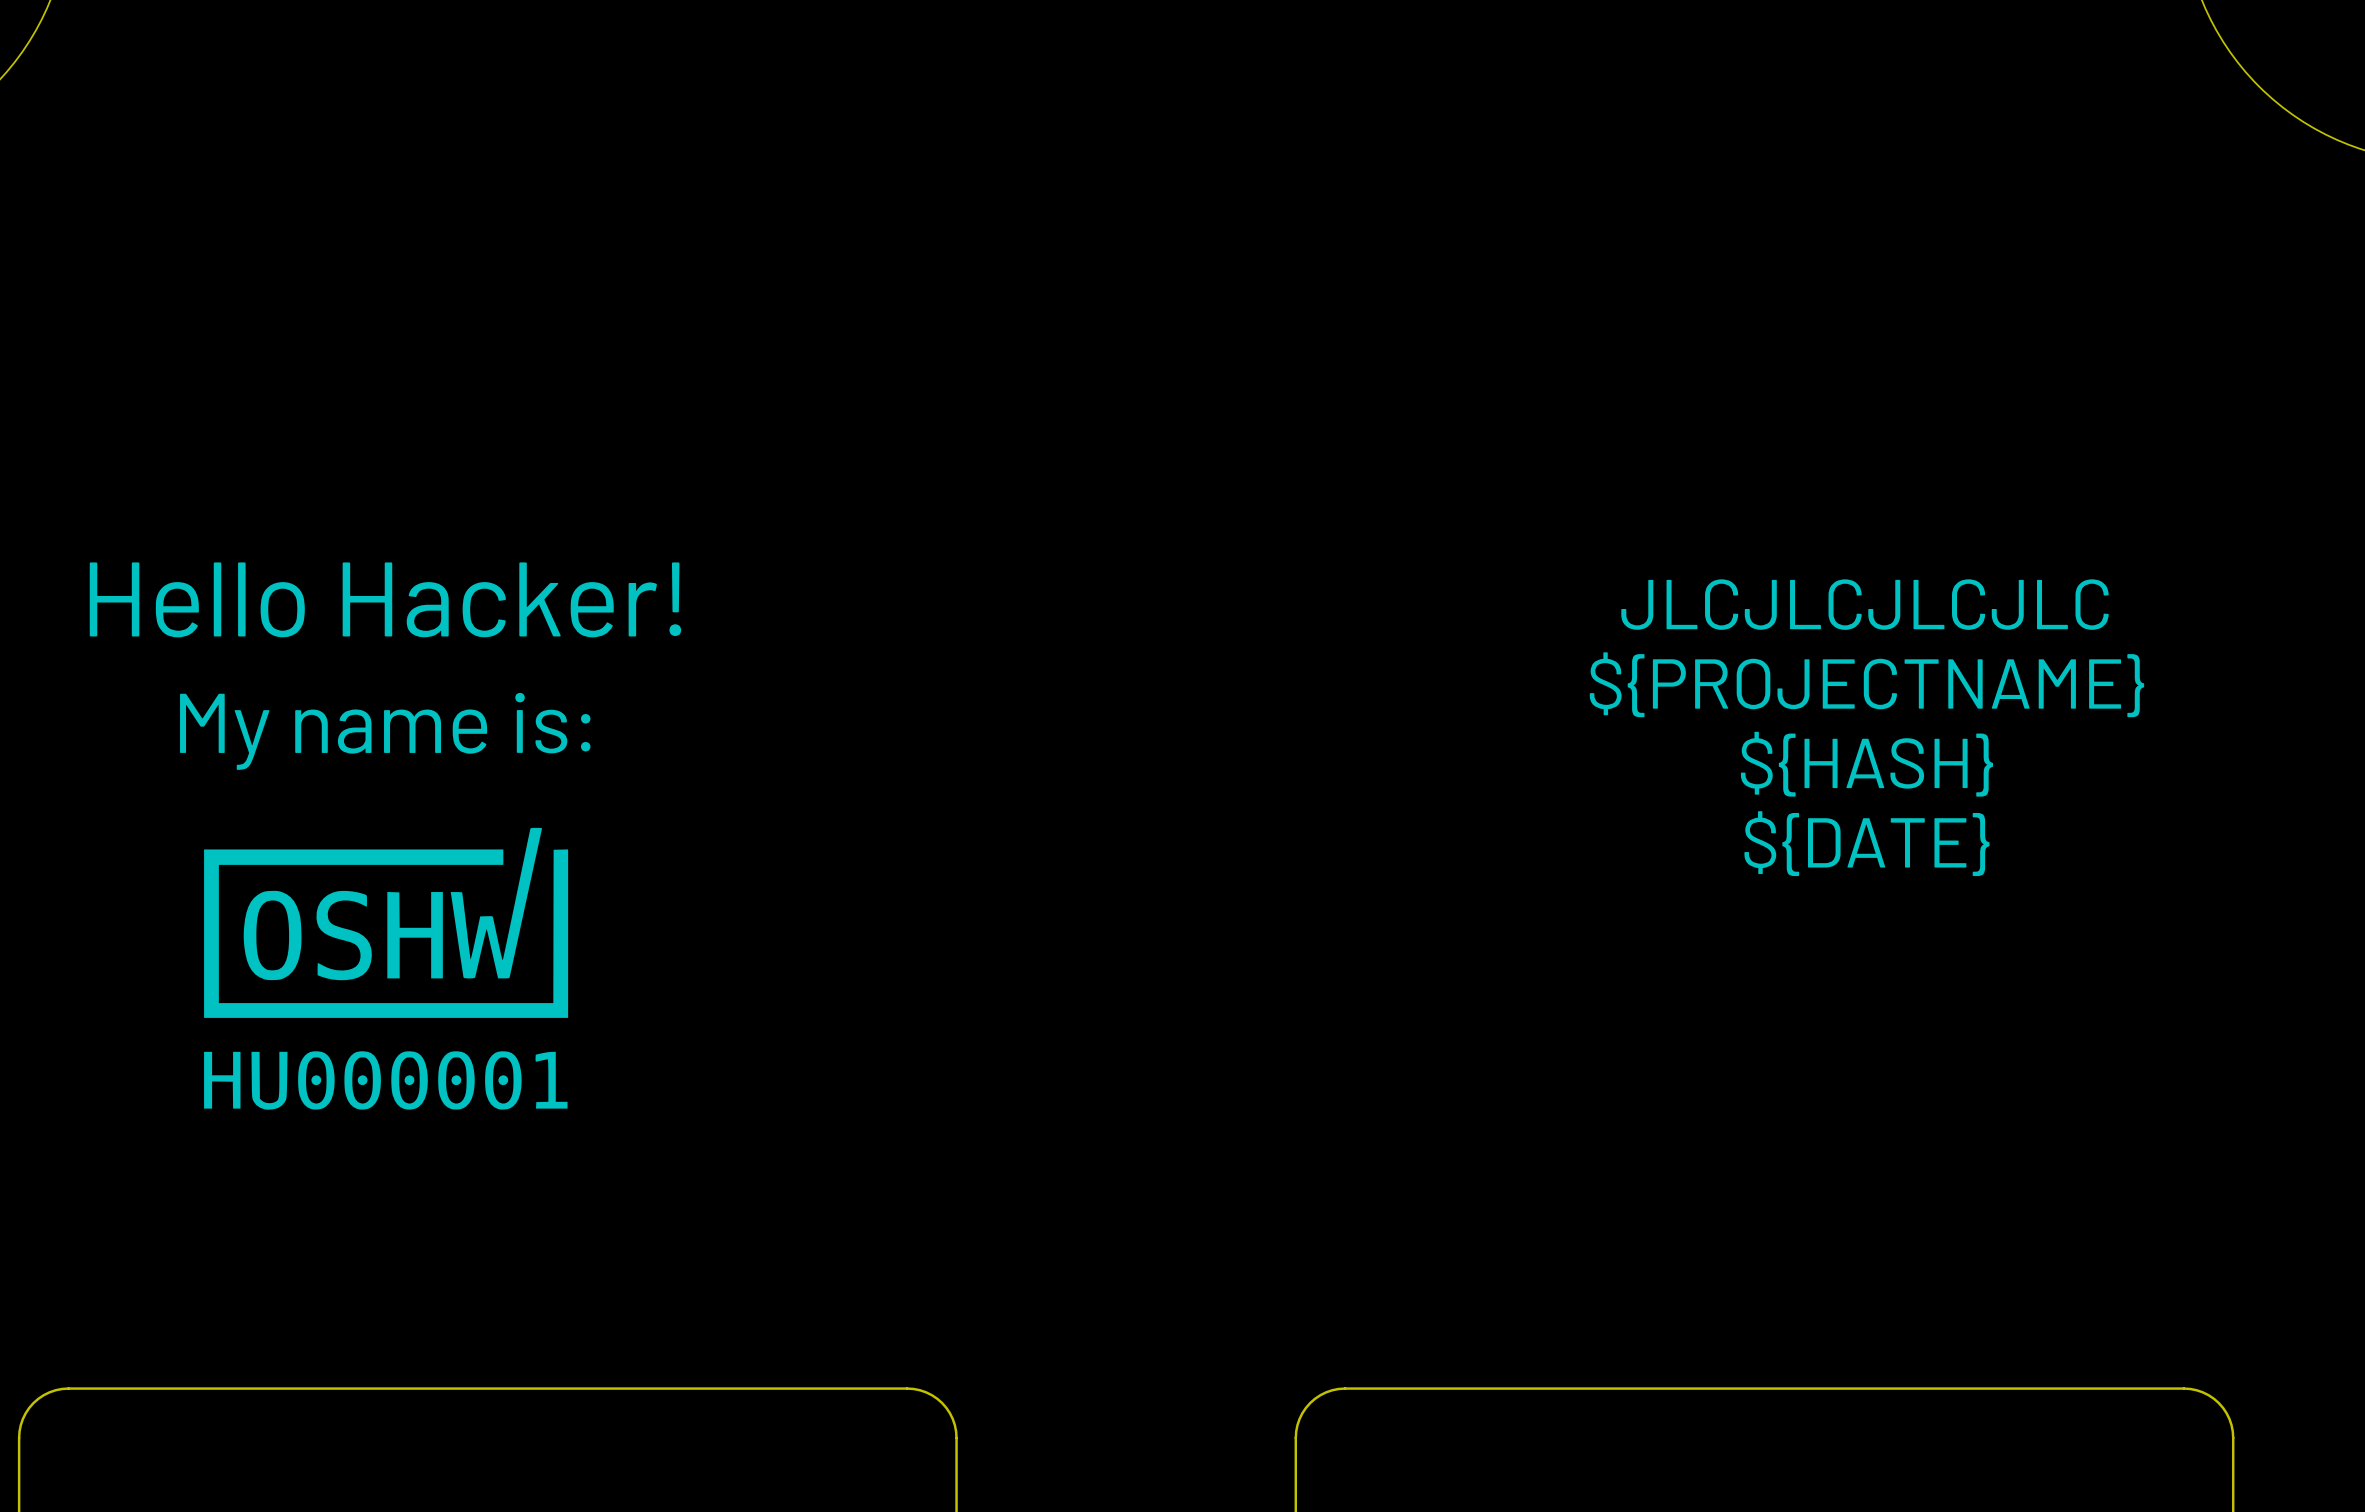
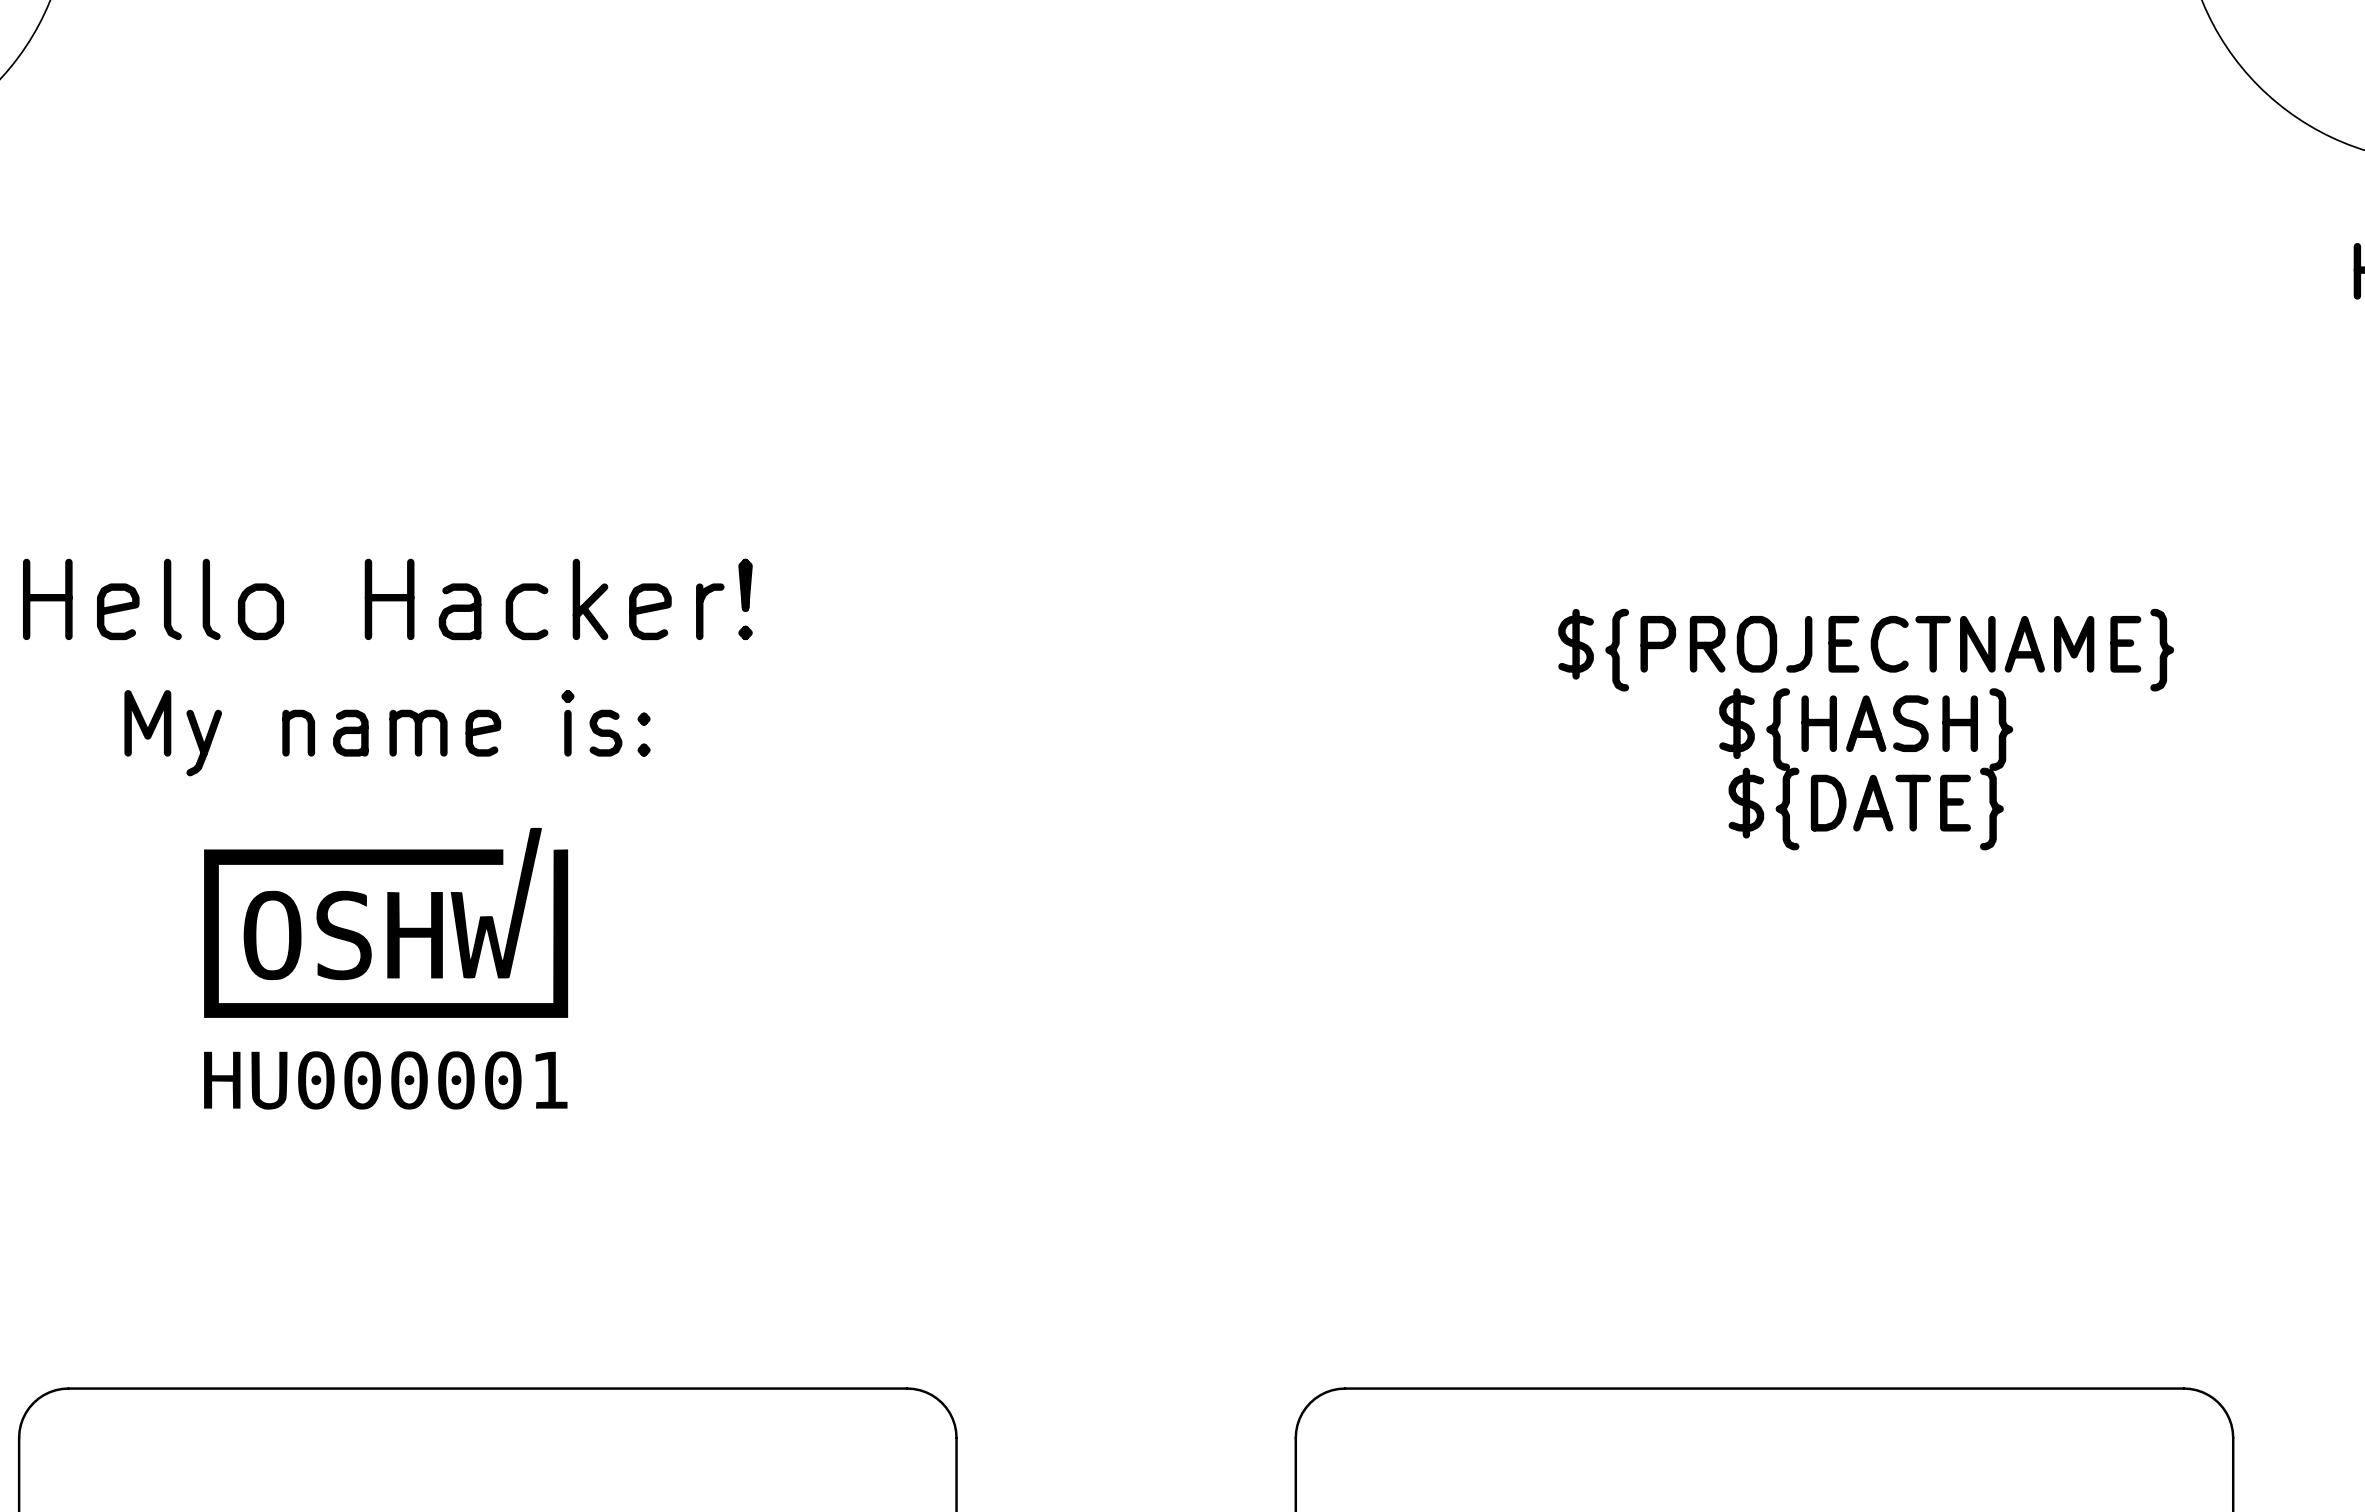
text: JLCJLCJLCJLC (1864, 604) -> none
text position: ${PROJECTNAME} (1866, 684) -> ${PROJECTNAME} (1866, 650)
text position: ${HASH} (1866, 764) -> ${HASH} (1866, 729)
text position: ${DATE} (1866, 843) -> ${DATE} (1866, 809)

